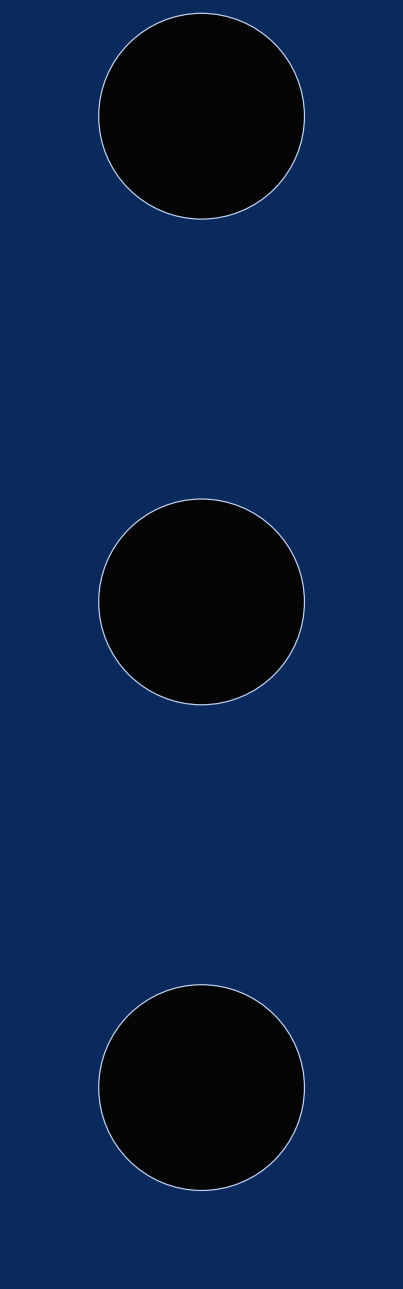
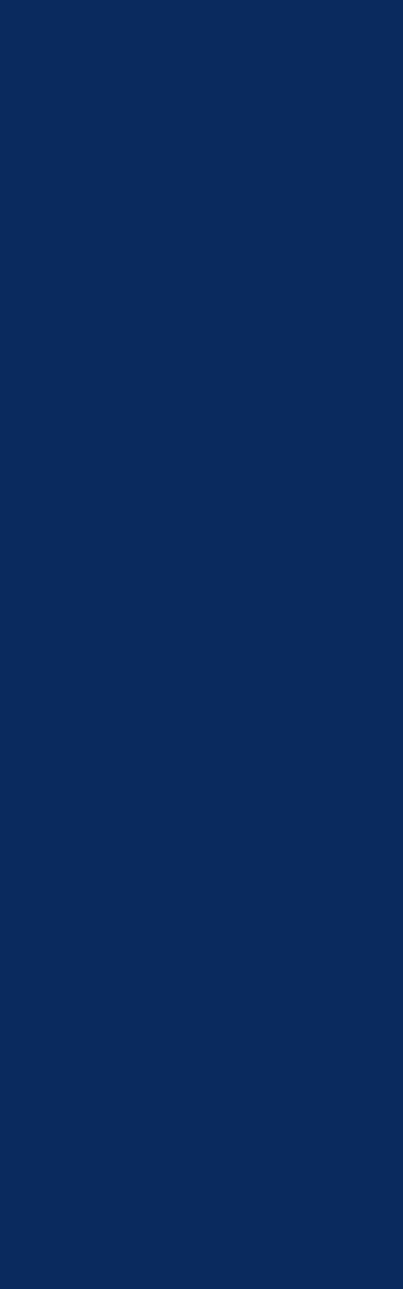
part: (201, 116) -> none
part: (201, 601) -> none
part: (201, 1087) -> none

